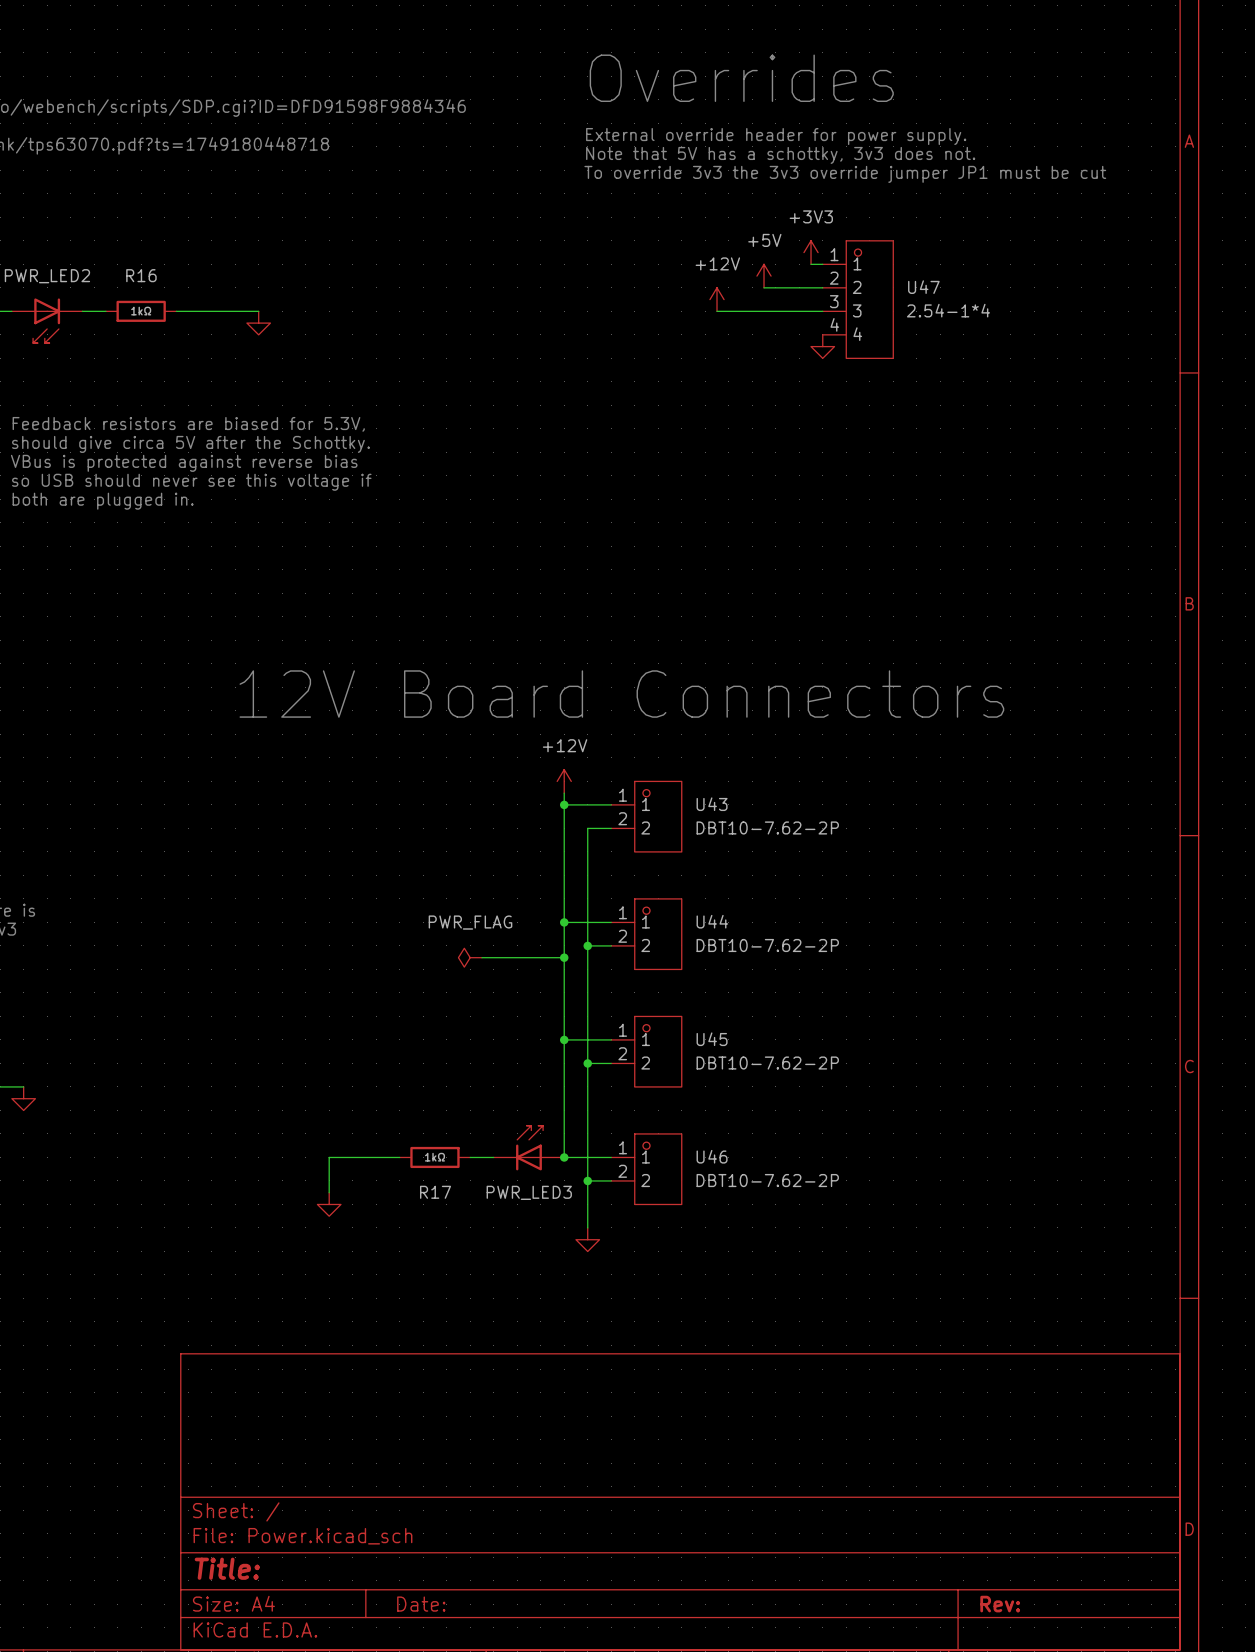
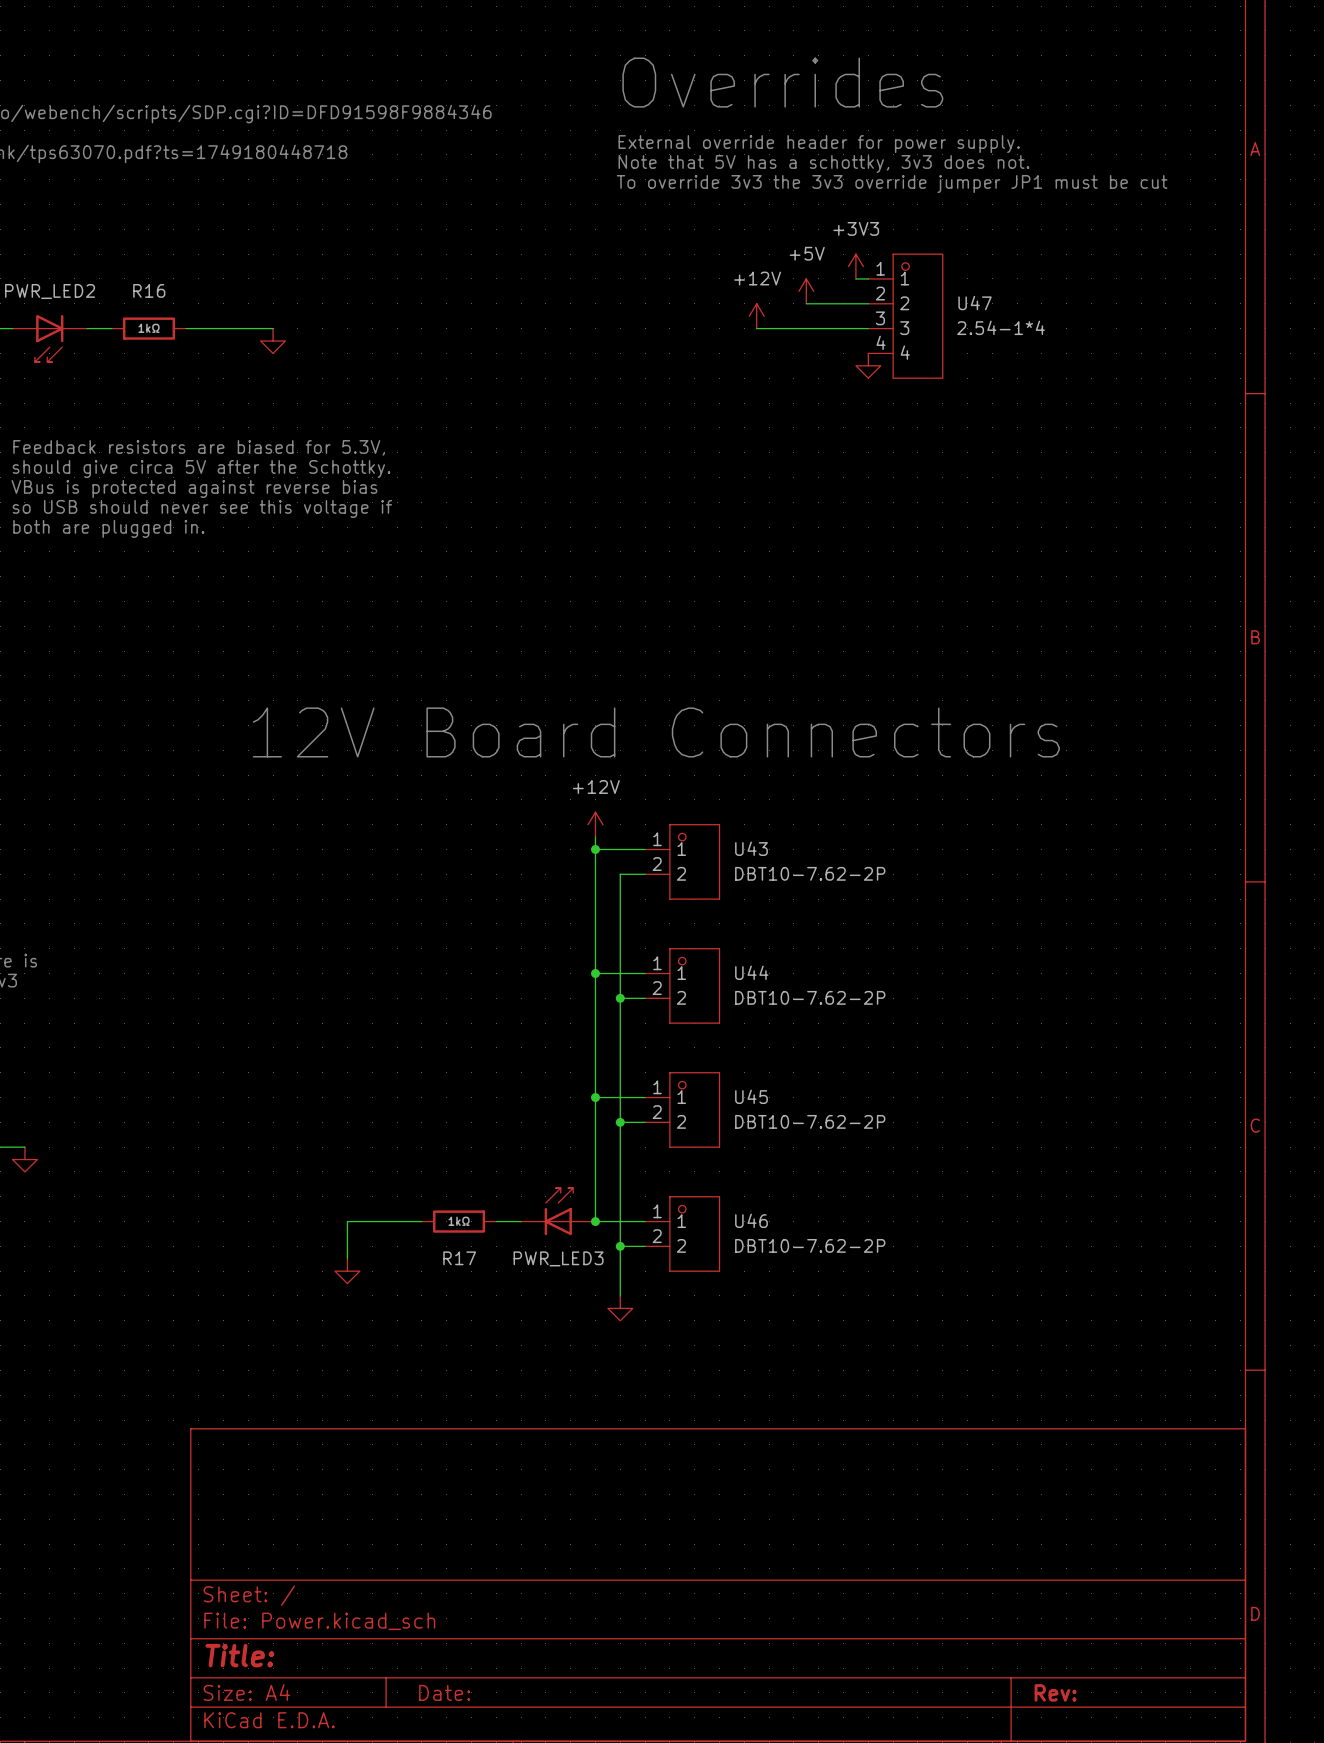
power symbol: PWR_FLAG (470, 957) -> none
wire: (481, 957) (564, 957) -> none
junction: (564, 957) -> none

